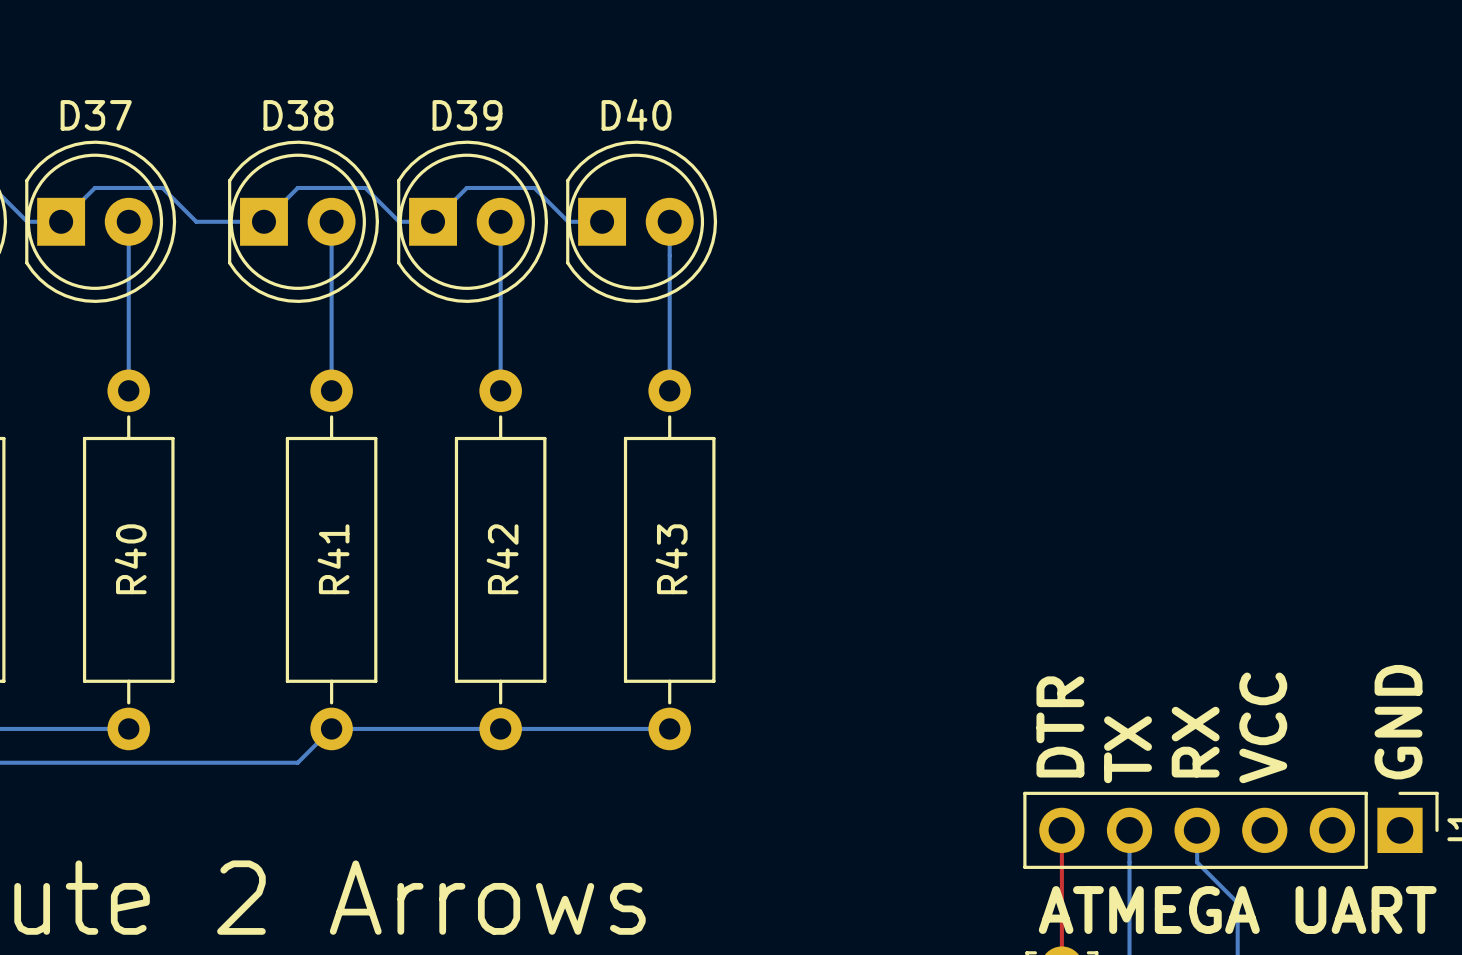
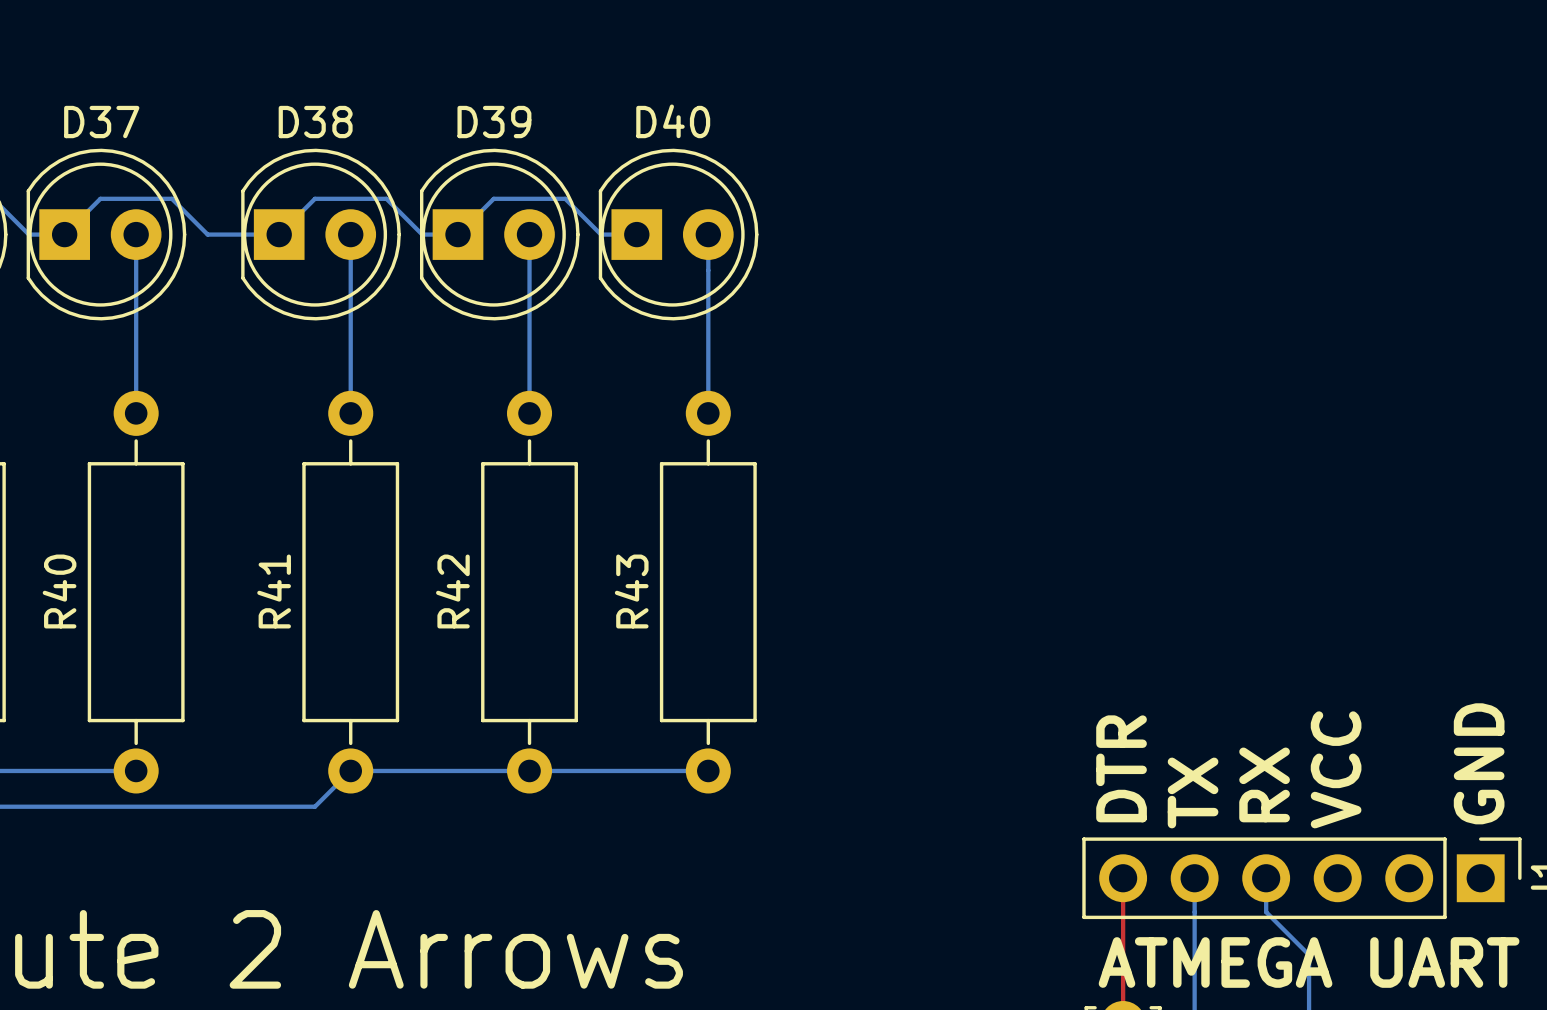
R40 name position: R40 (130, 559) -> R40 (59, 591)
R41 name position: R41 (333, 559) -> R41 (274, 591)
R42 name position: R42 (502, 559) -> R42 (452, 591)
R43 name position: R43 (671, 559) -> R43 (631, 591)

